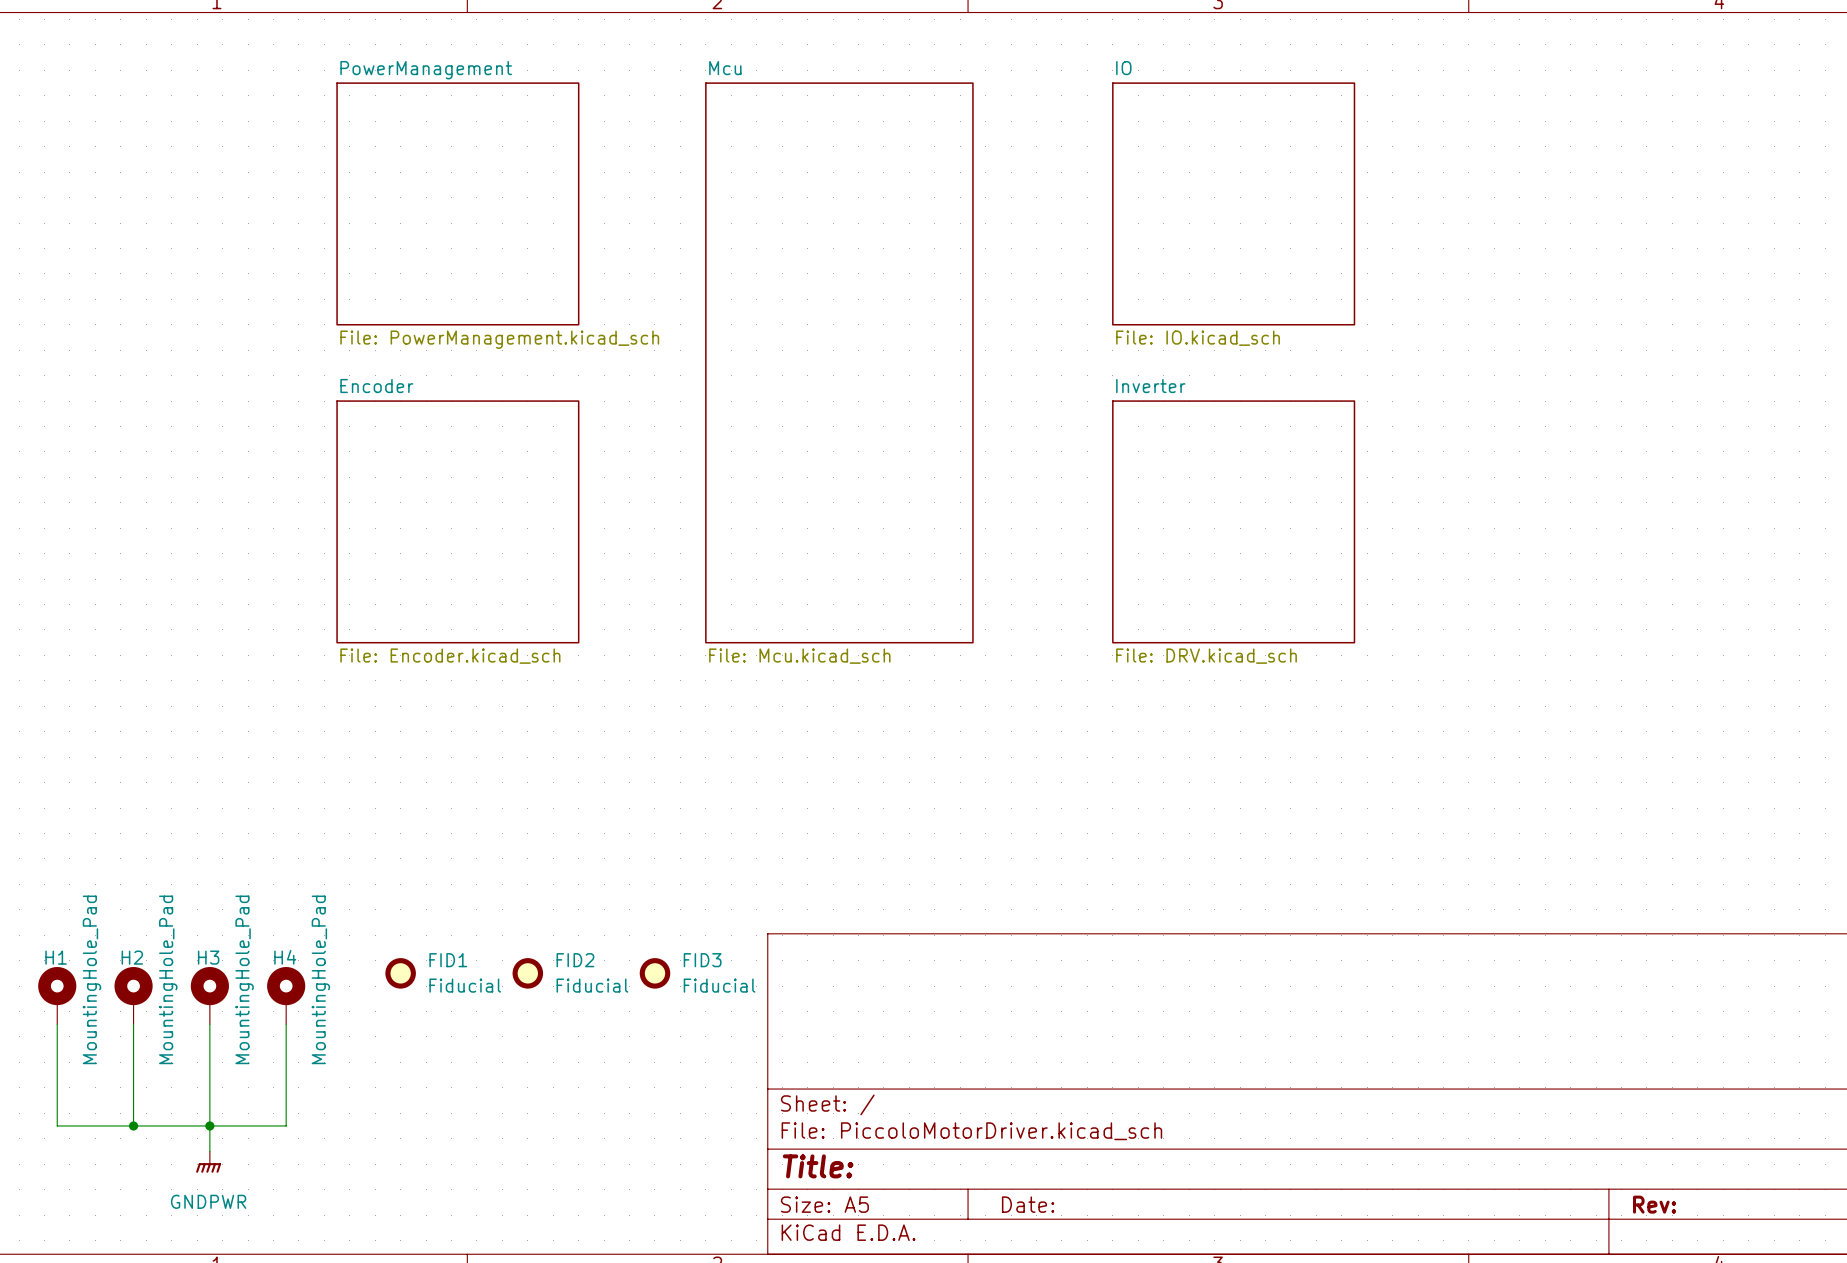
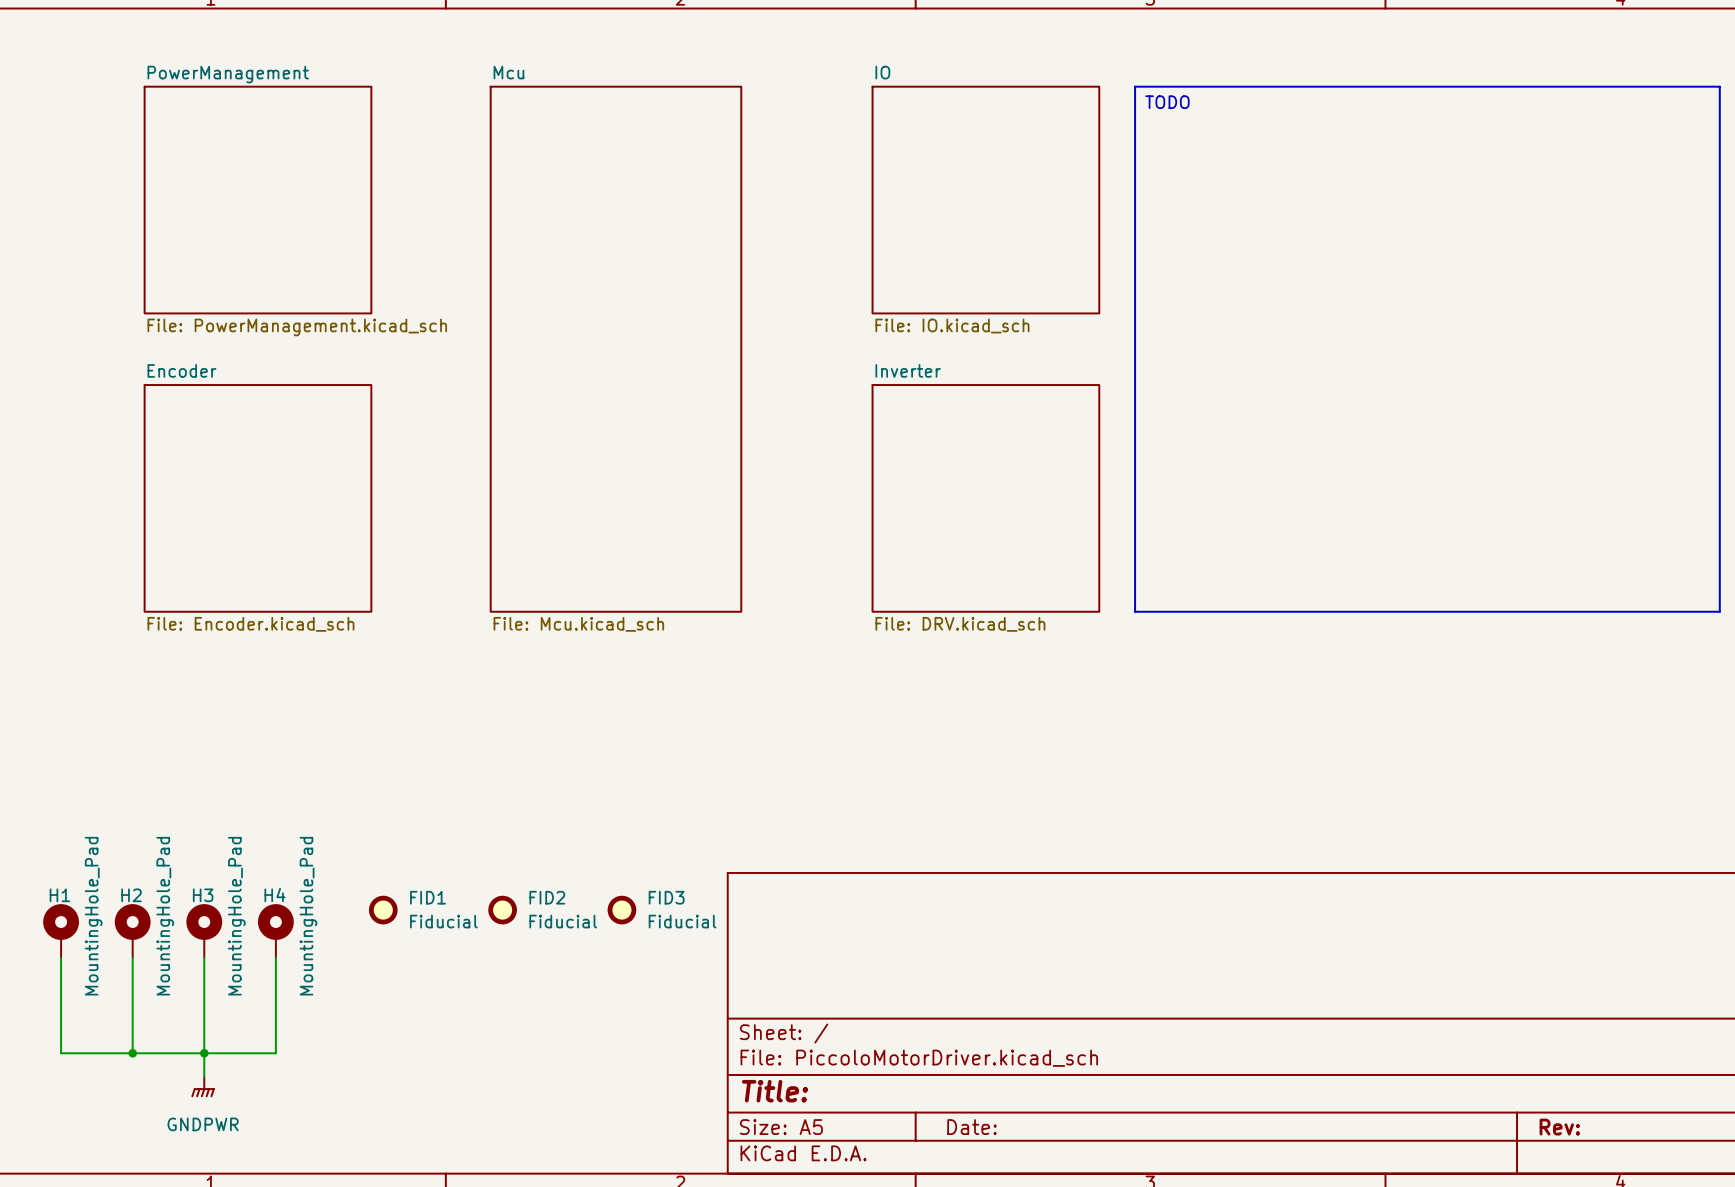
line: none -> (1135, 86) (1719, 86) (1719, 611) (1135, 611) (1135, 86)
text: none -> TODO (1167, 102)
sheet PowerManagement position: (457, 203) -> (257, 200)
sheet IO position: (1233, 203) -> (985, 200)
sheet Mcu position: (839, 362) -> (615, 349)
sheet Encoder position: (457, 521) -> (257, 498)
sheet Inverter position: (1233, 521) -> (985, 498)

